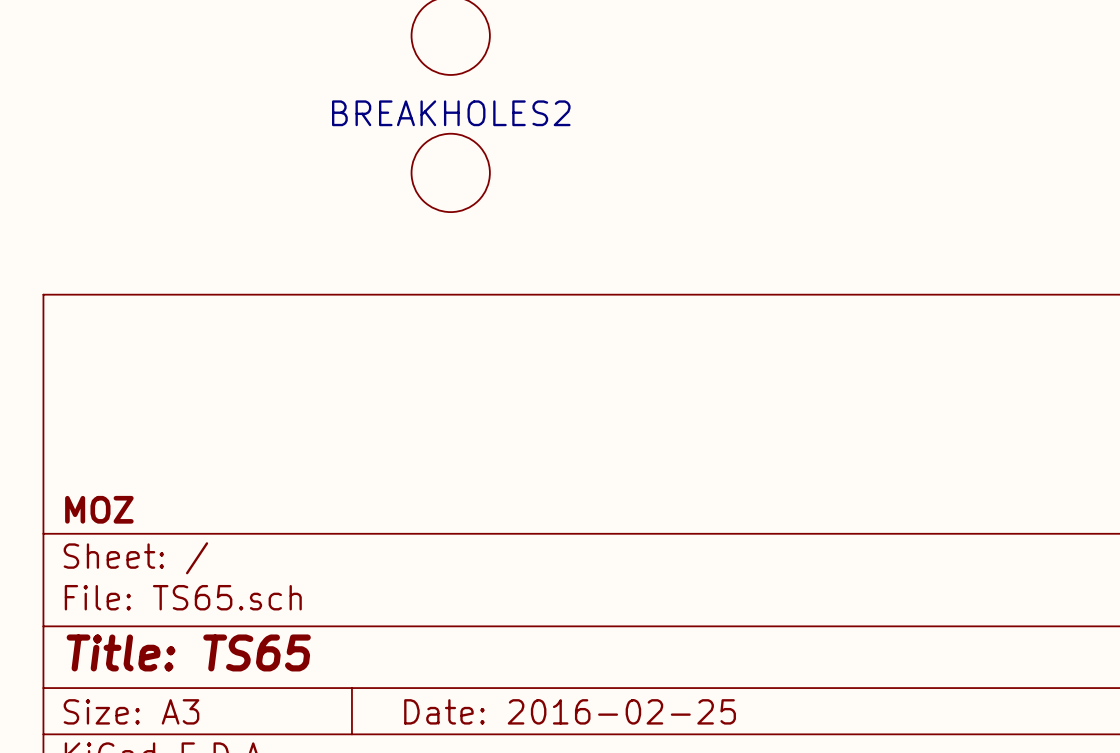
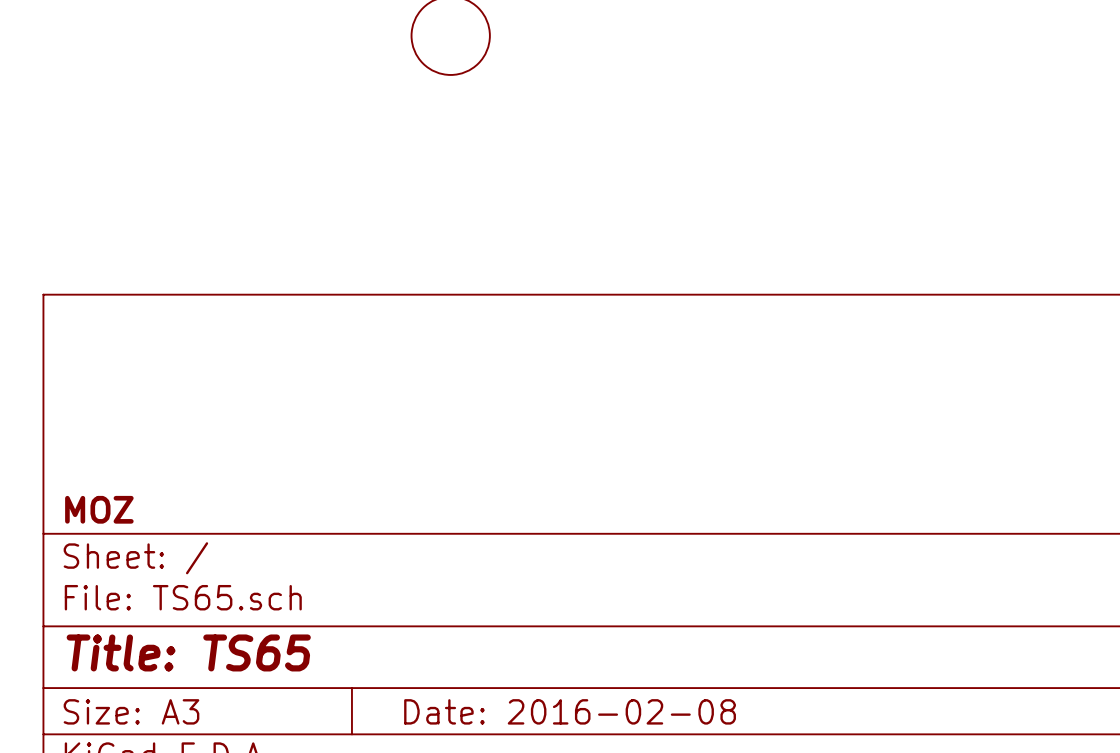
BREAKHOLES2: (450, 172) -> none
title block: Date: 2016-02-25 (570, 711) -> Date: 2016-02-08 (570, 711)

